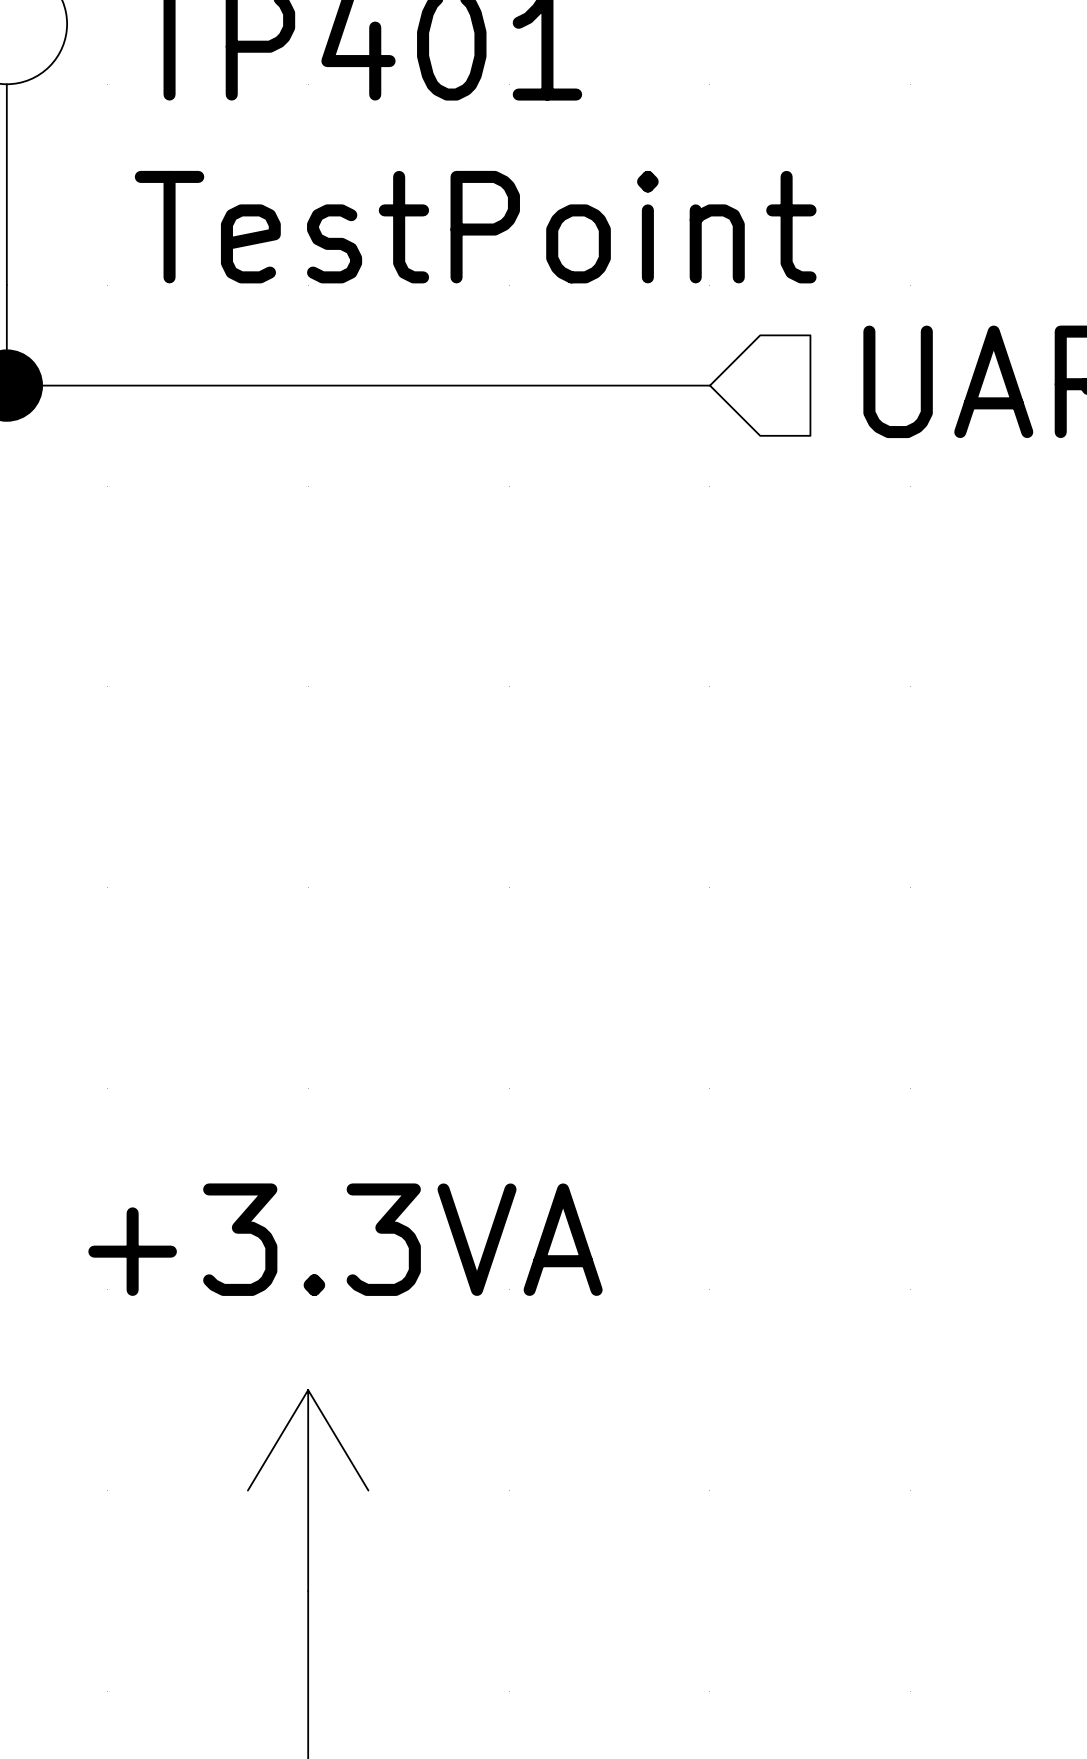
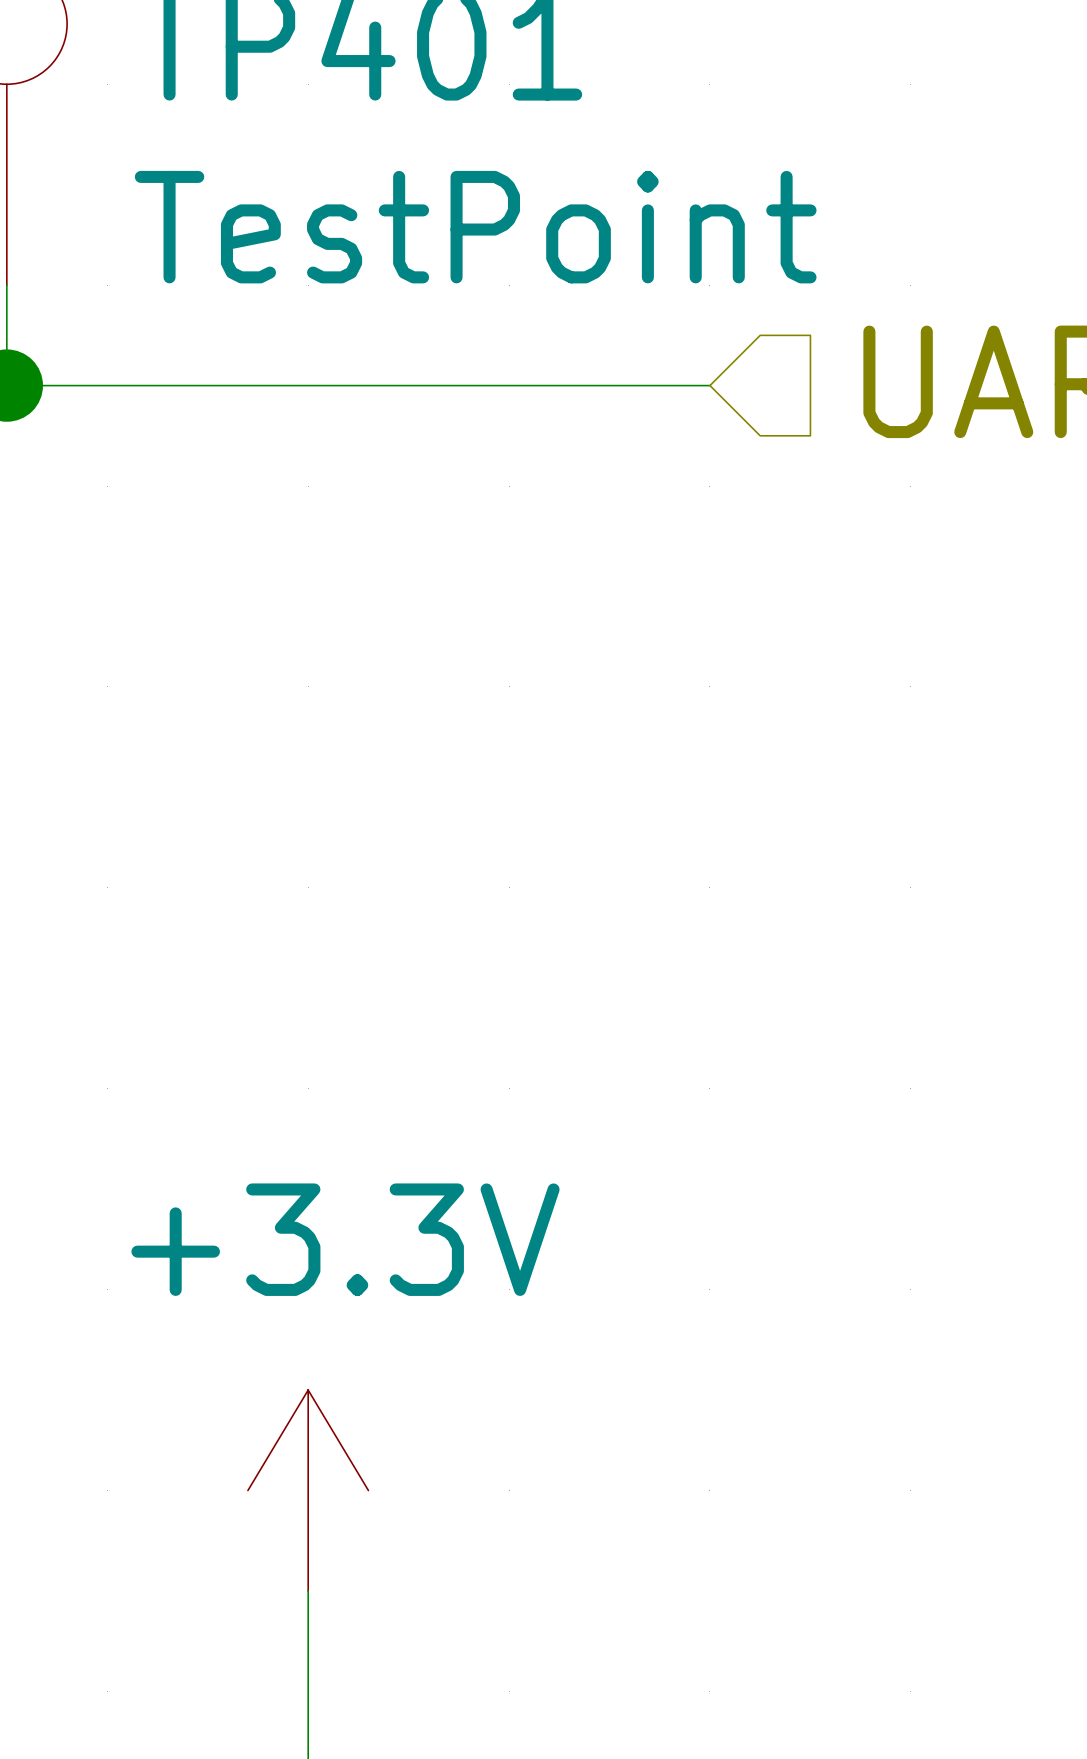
power symbol: +3.3VA (308, 1490) -> +3.3V (308, 1490)

